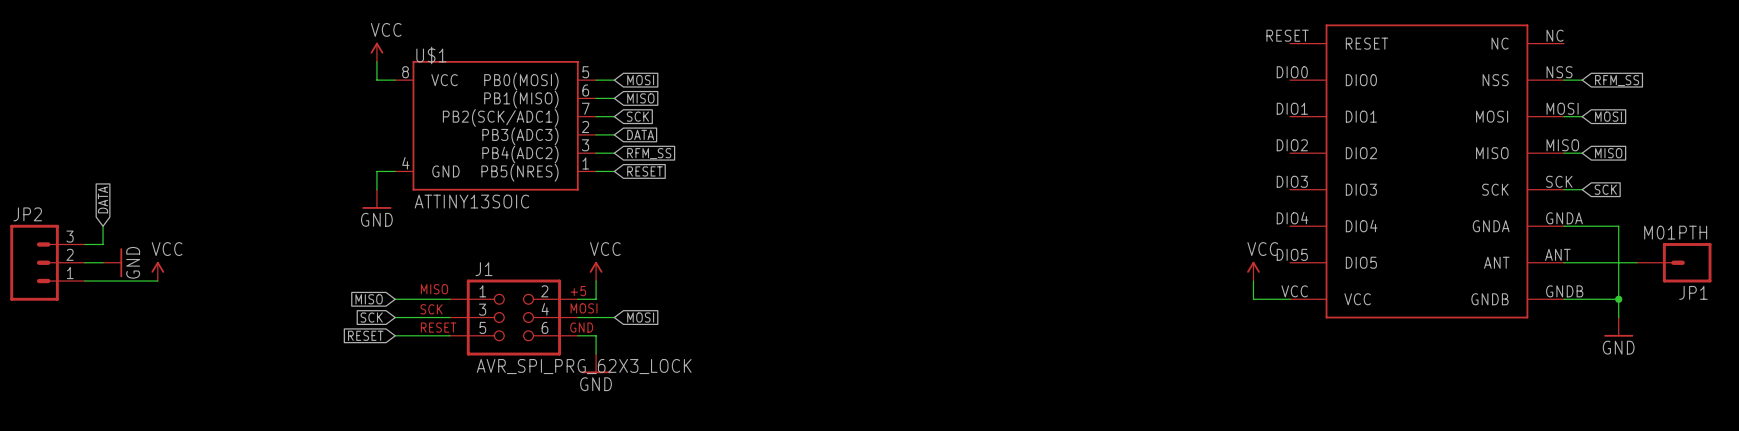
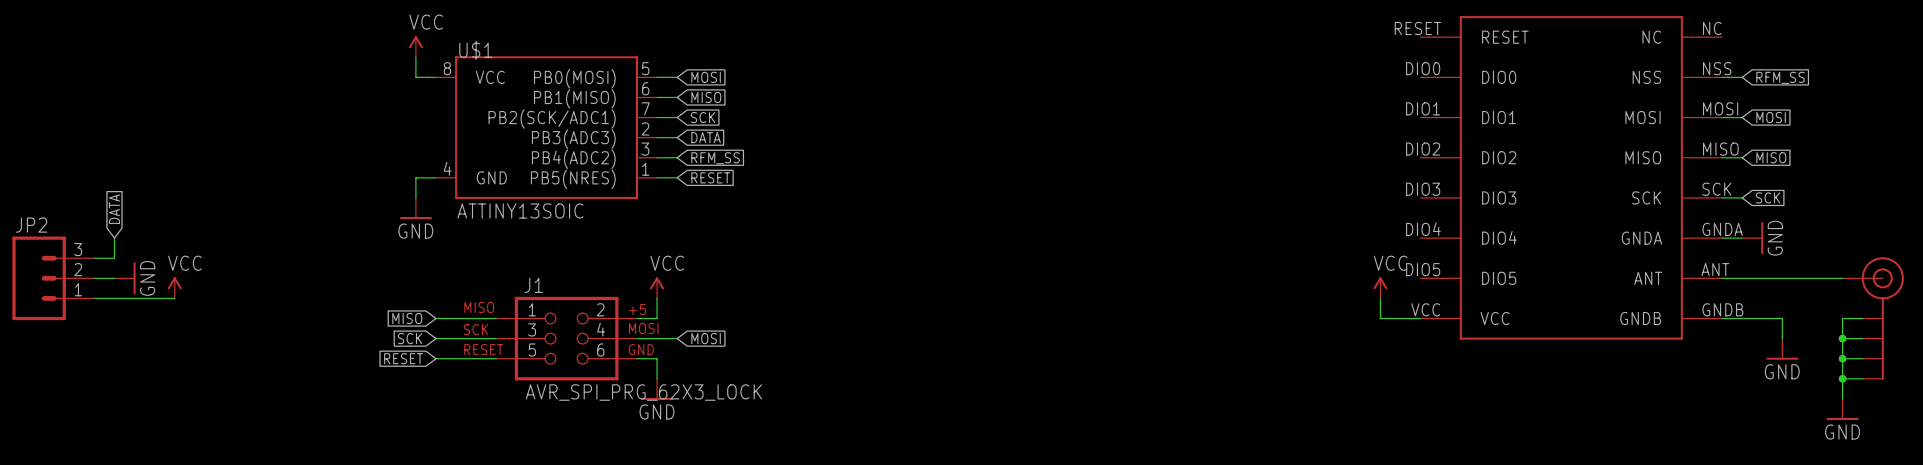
wire: (1582, 226) (1618, 226) (1618, 299) -> none
power symbol: none -> GND (1752, 238)
JP1: M01PTH (1674, 262) -> none
junction: (1618, 299) -> none
wire: none -> (1862, 318) (1842, 318) (1842, 398)
part: none -> (1873, 318)
wire: none -> (1842, 338) (1862, 338)
junction: none -> (1842, 338)
wire: none -> (1842, 358) (1862, 358)
junction: none -> (1842, 358)
wire: none -> (1842, 378) (1862, 378)
junction: none -> (1842, 378)
power symbol: none -> GND (1842, 409)

